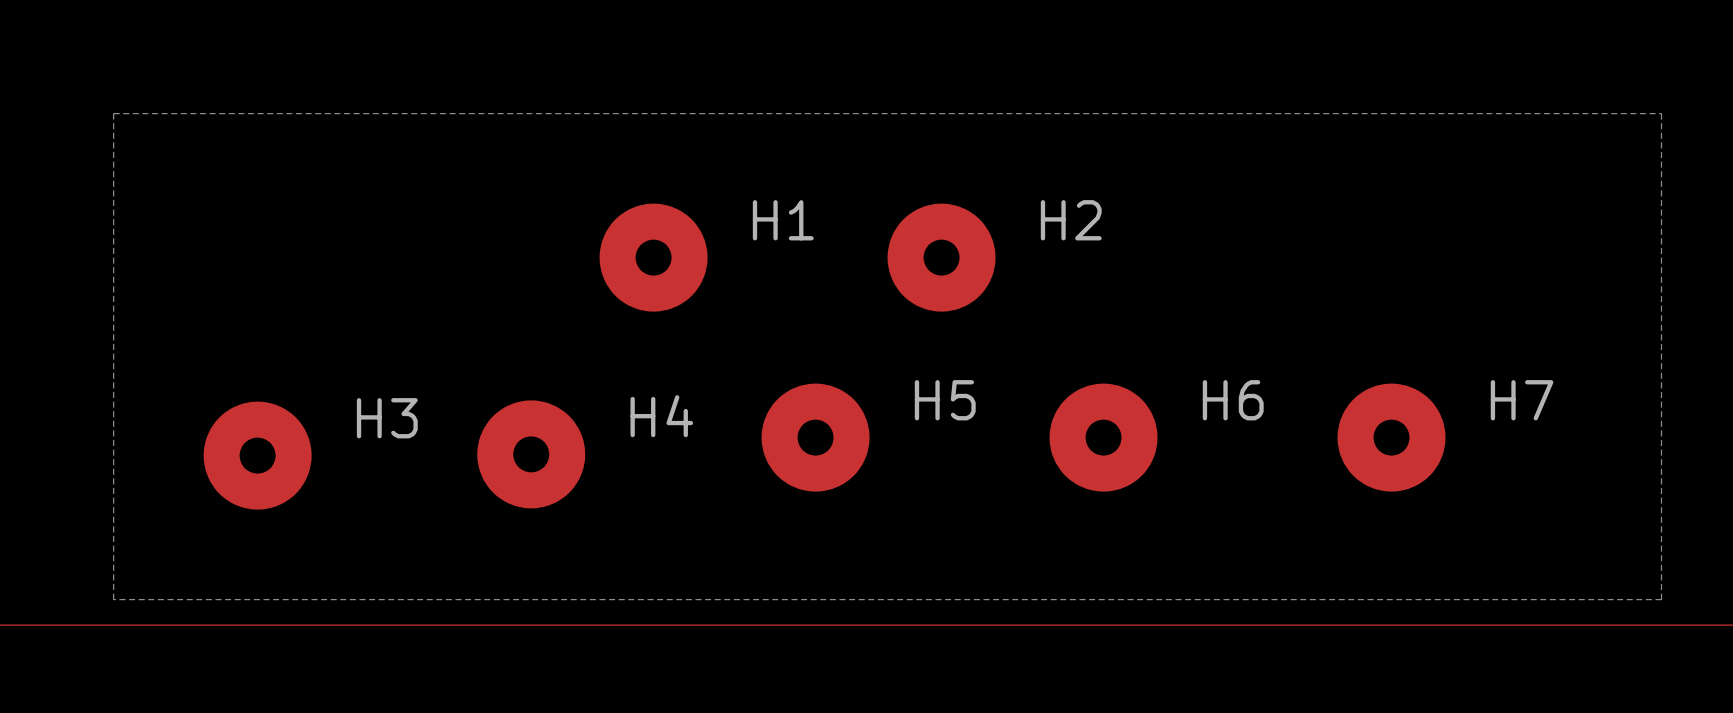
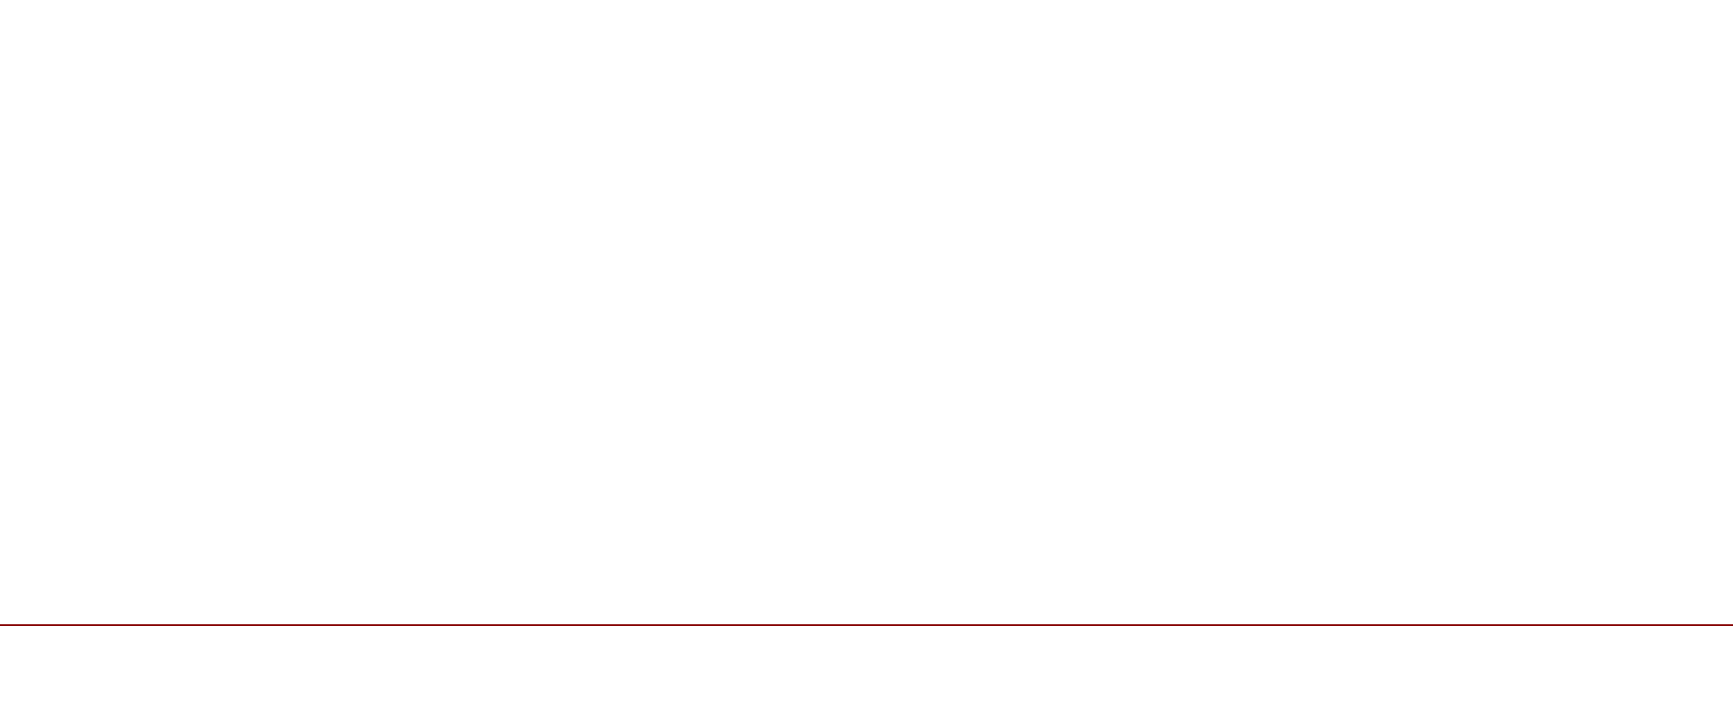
line: (113, 113) (1661, 113) (1661, 599) (113, 599) (113, 113) -> none
H1: (653, 257) -> none
H2: (941, 257) -> none
H5: (815, 437) -> none
H6: (1103, 437) -> none
H7: (1391, 437) -> none
H4: (531, 454) -> none
H3: (257, 455) -> none

